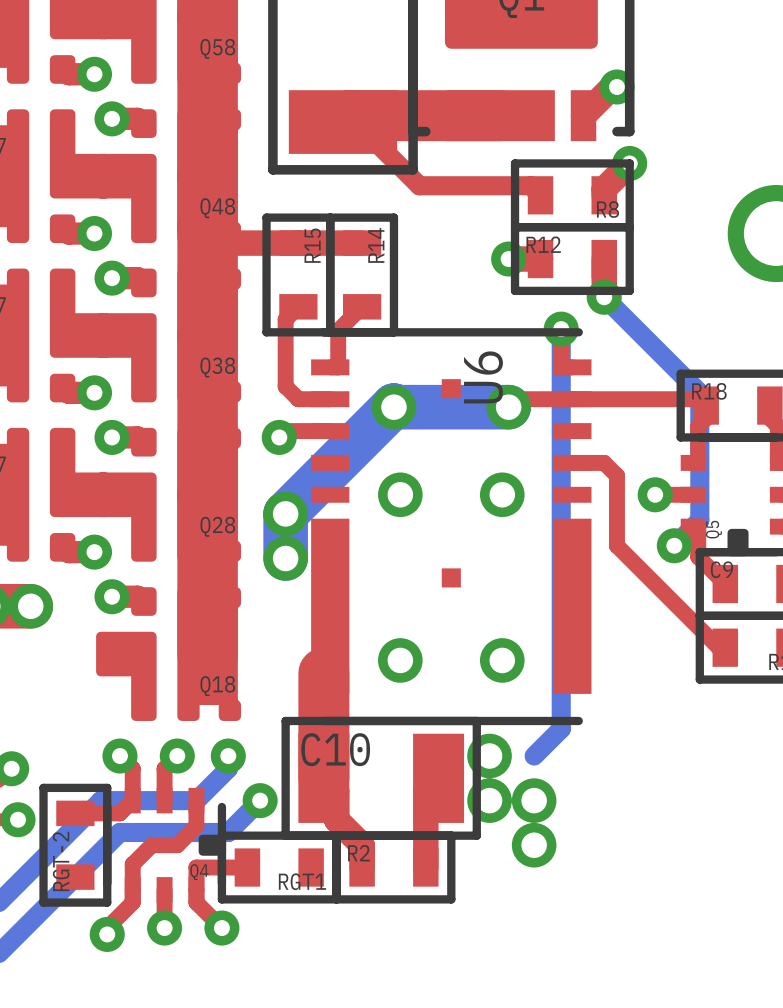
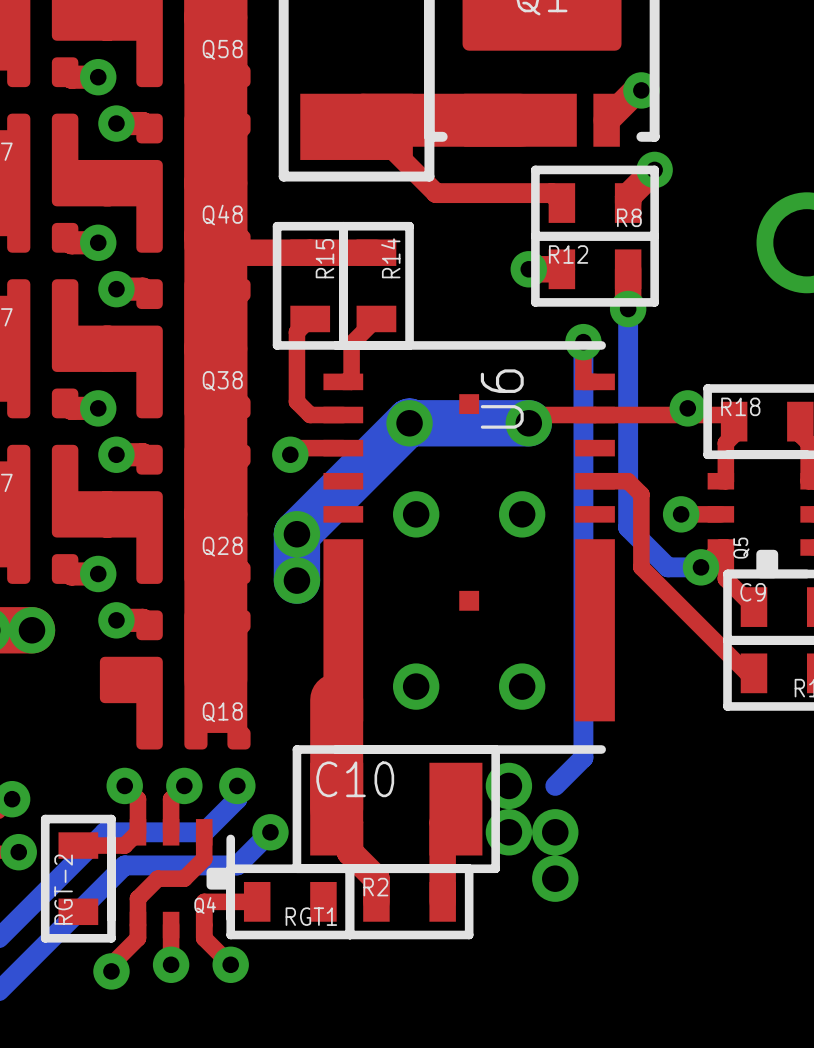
bottom track: (604, 297) (699, 392) (699, 520) (674, 545) -> (628, 309) (628, 527) (667, 567) (701, 567)
via: none -> (687, 408)

